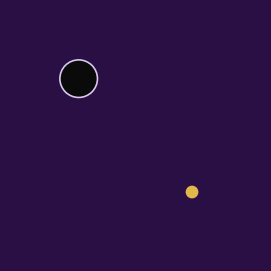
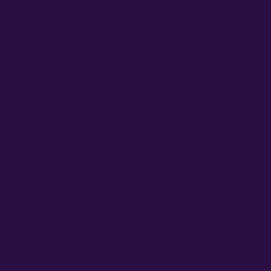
hole: (78, 78) -> none
part: (192, 192) -> none

